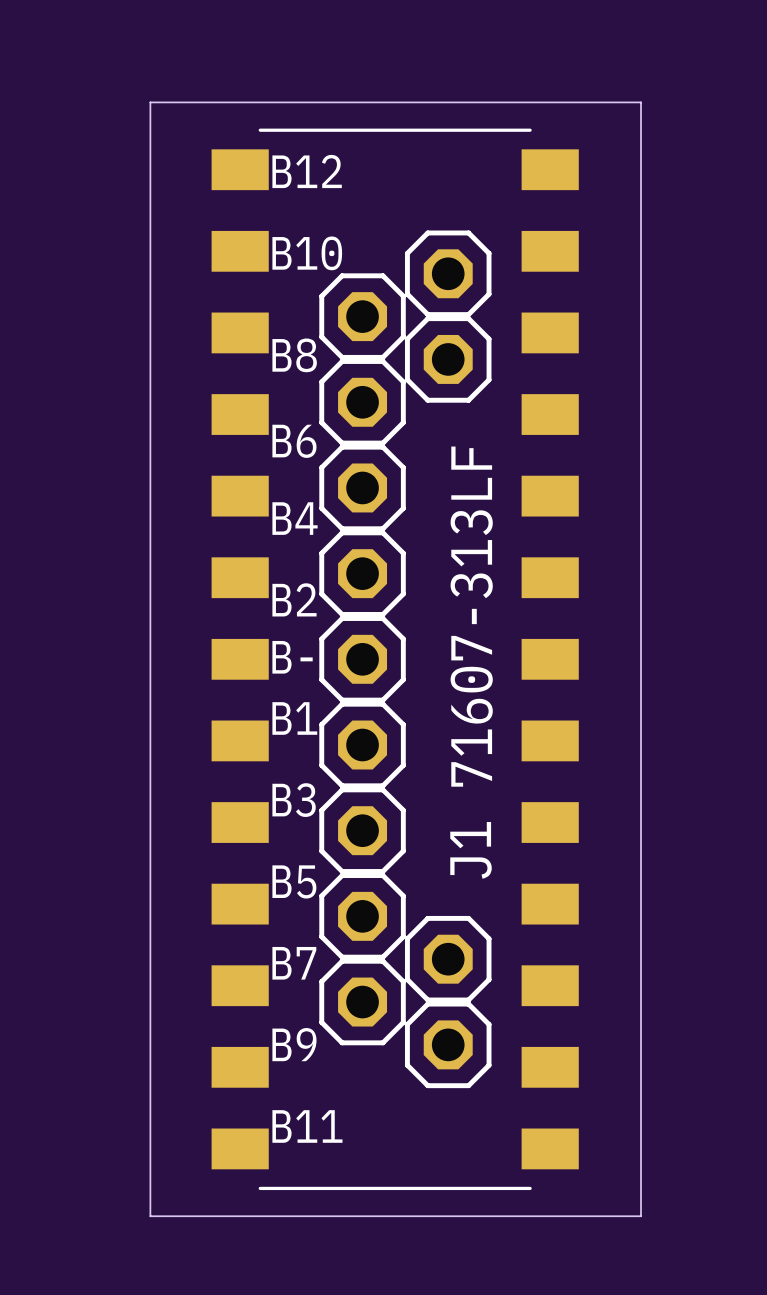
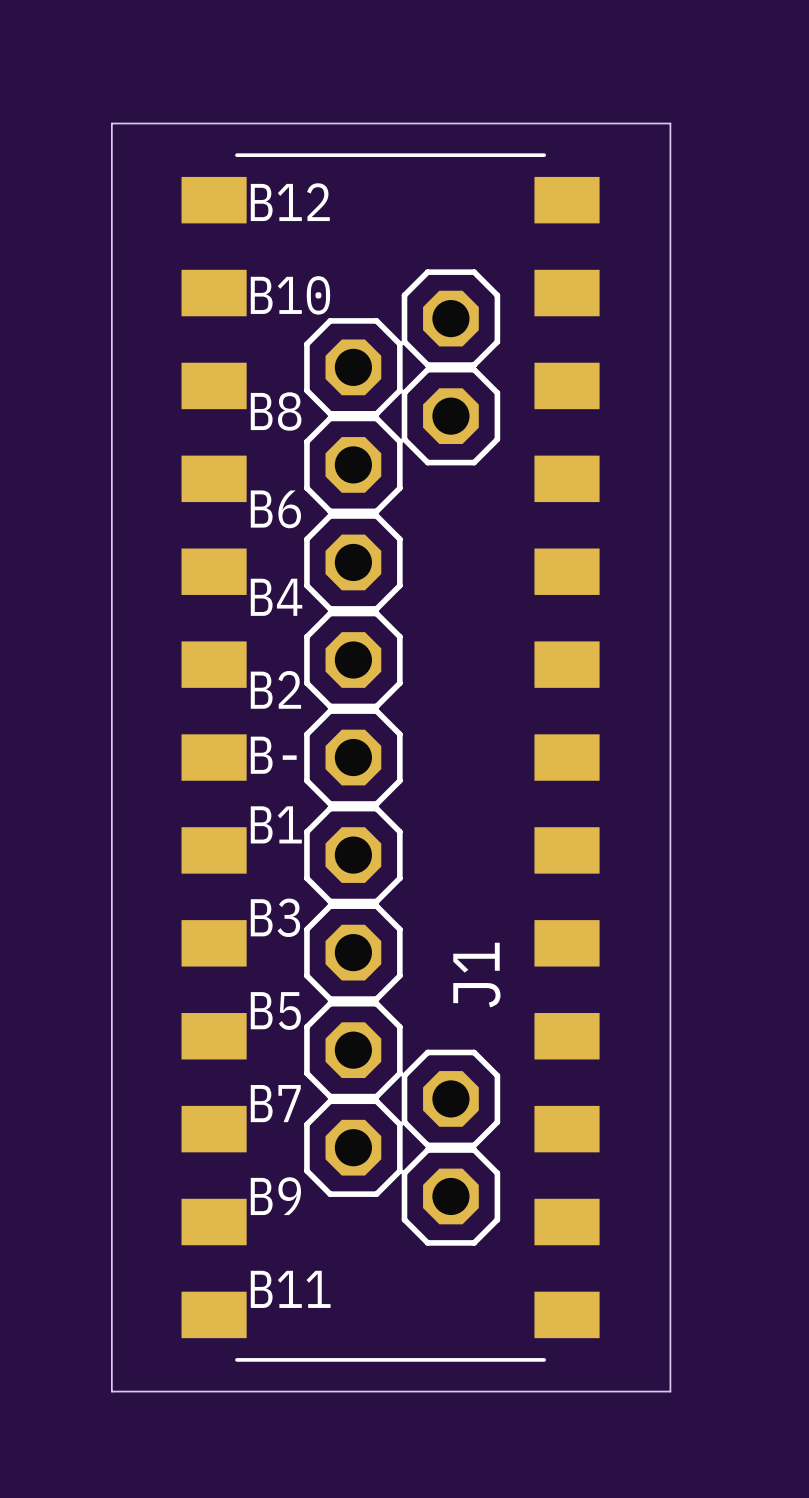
J1 value: 71607-313LF (471, 616) -> none

